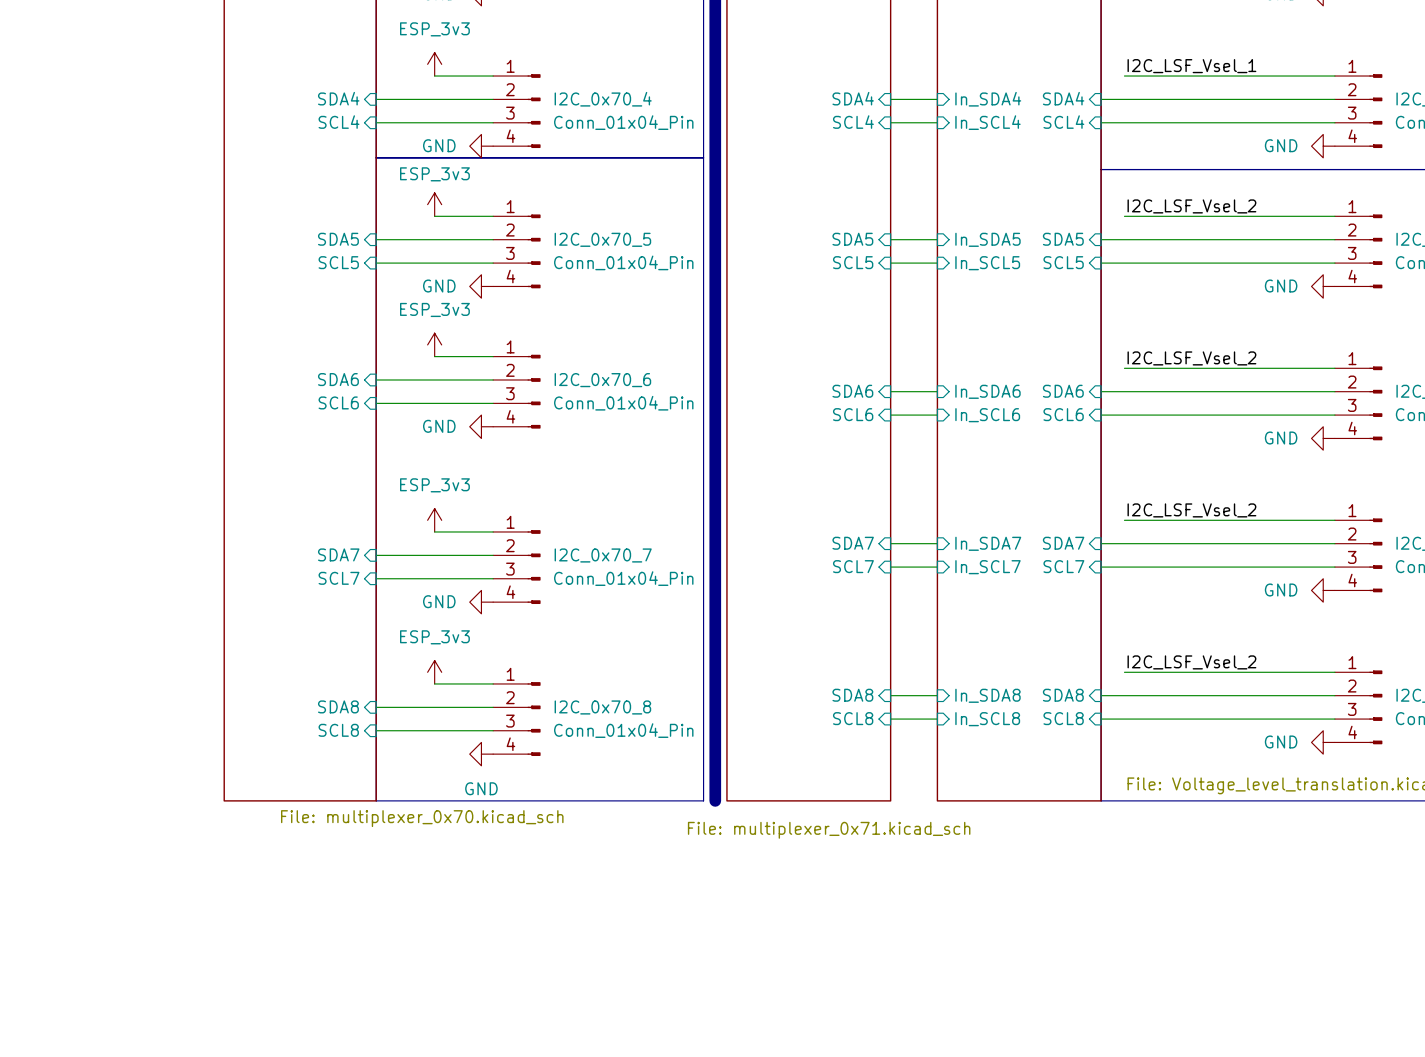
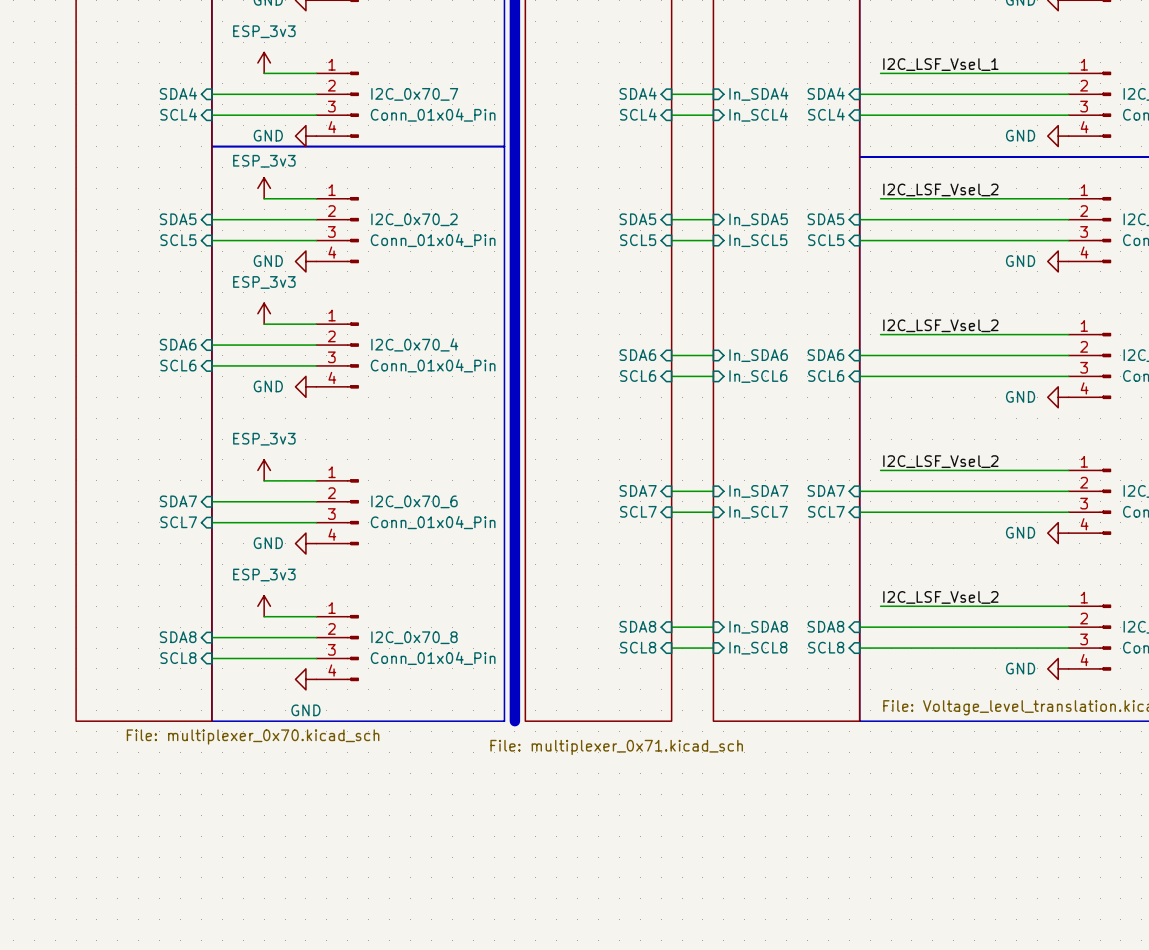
I2C_0x70_4 name: I2C_0x70_4 (603, 99) -> I2C_0x70_7 (414, 94)
I2C_0x70_5 name: I2C_0x70_5 (602, 239) -> I2C_0x70_2 (414, 219)
I2C_0x70_6 name: I2C_0x70_6 (602, 380) -> I2C_0x70_4 (414, 344)
I2C_0x70_7 name: I2C_0x70_7 (603, 555) -> I2C_0x70_6 (414, 501)

